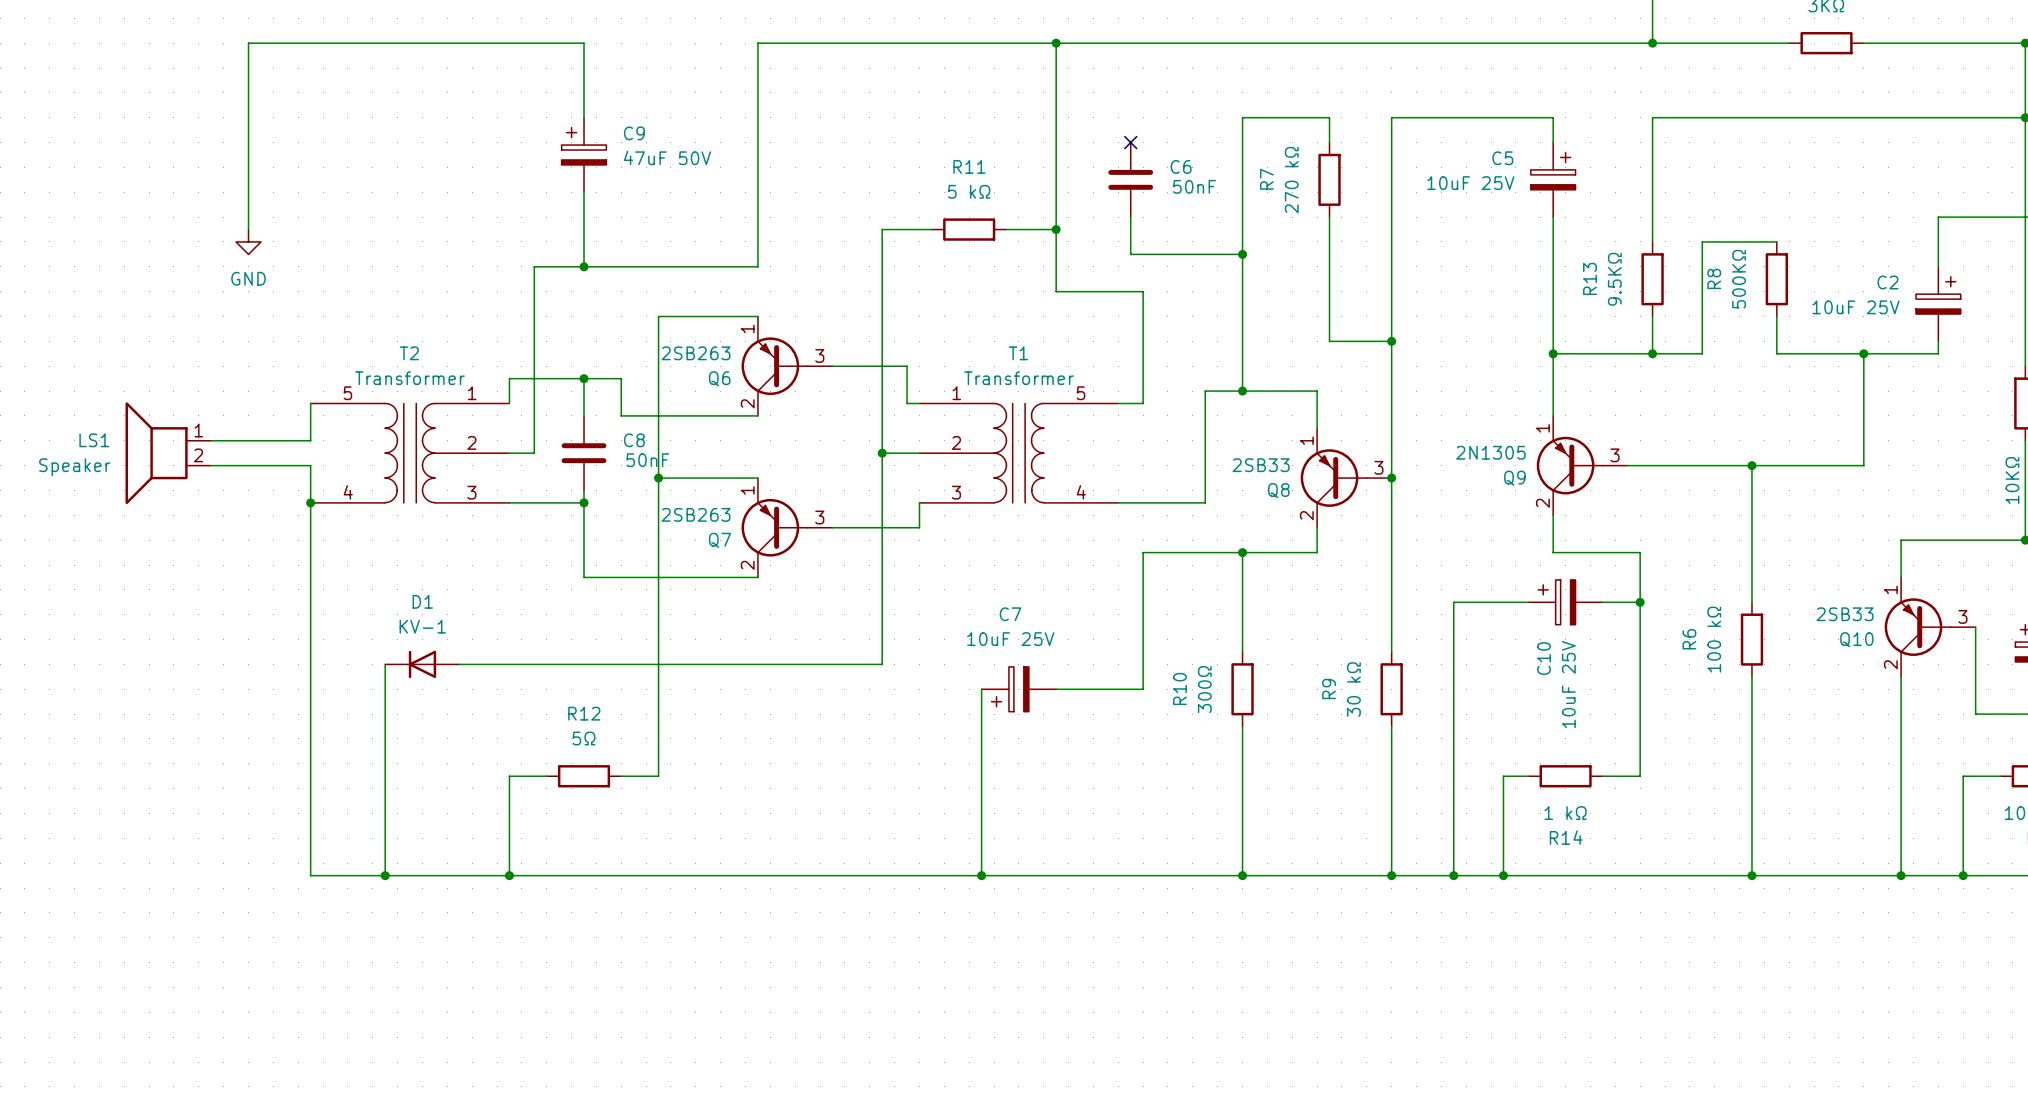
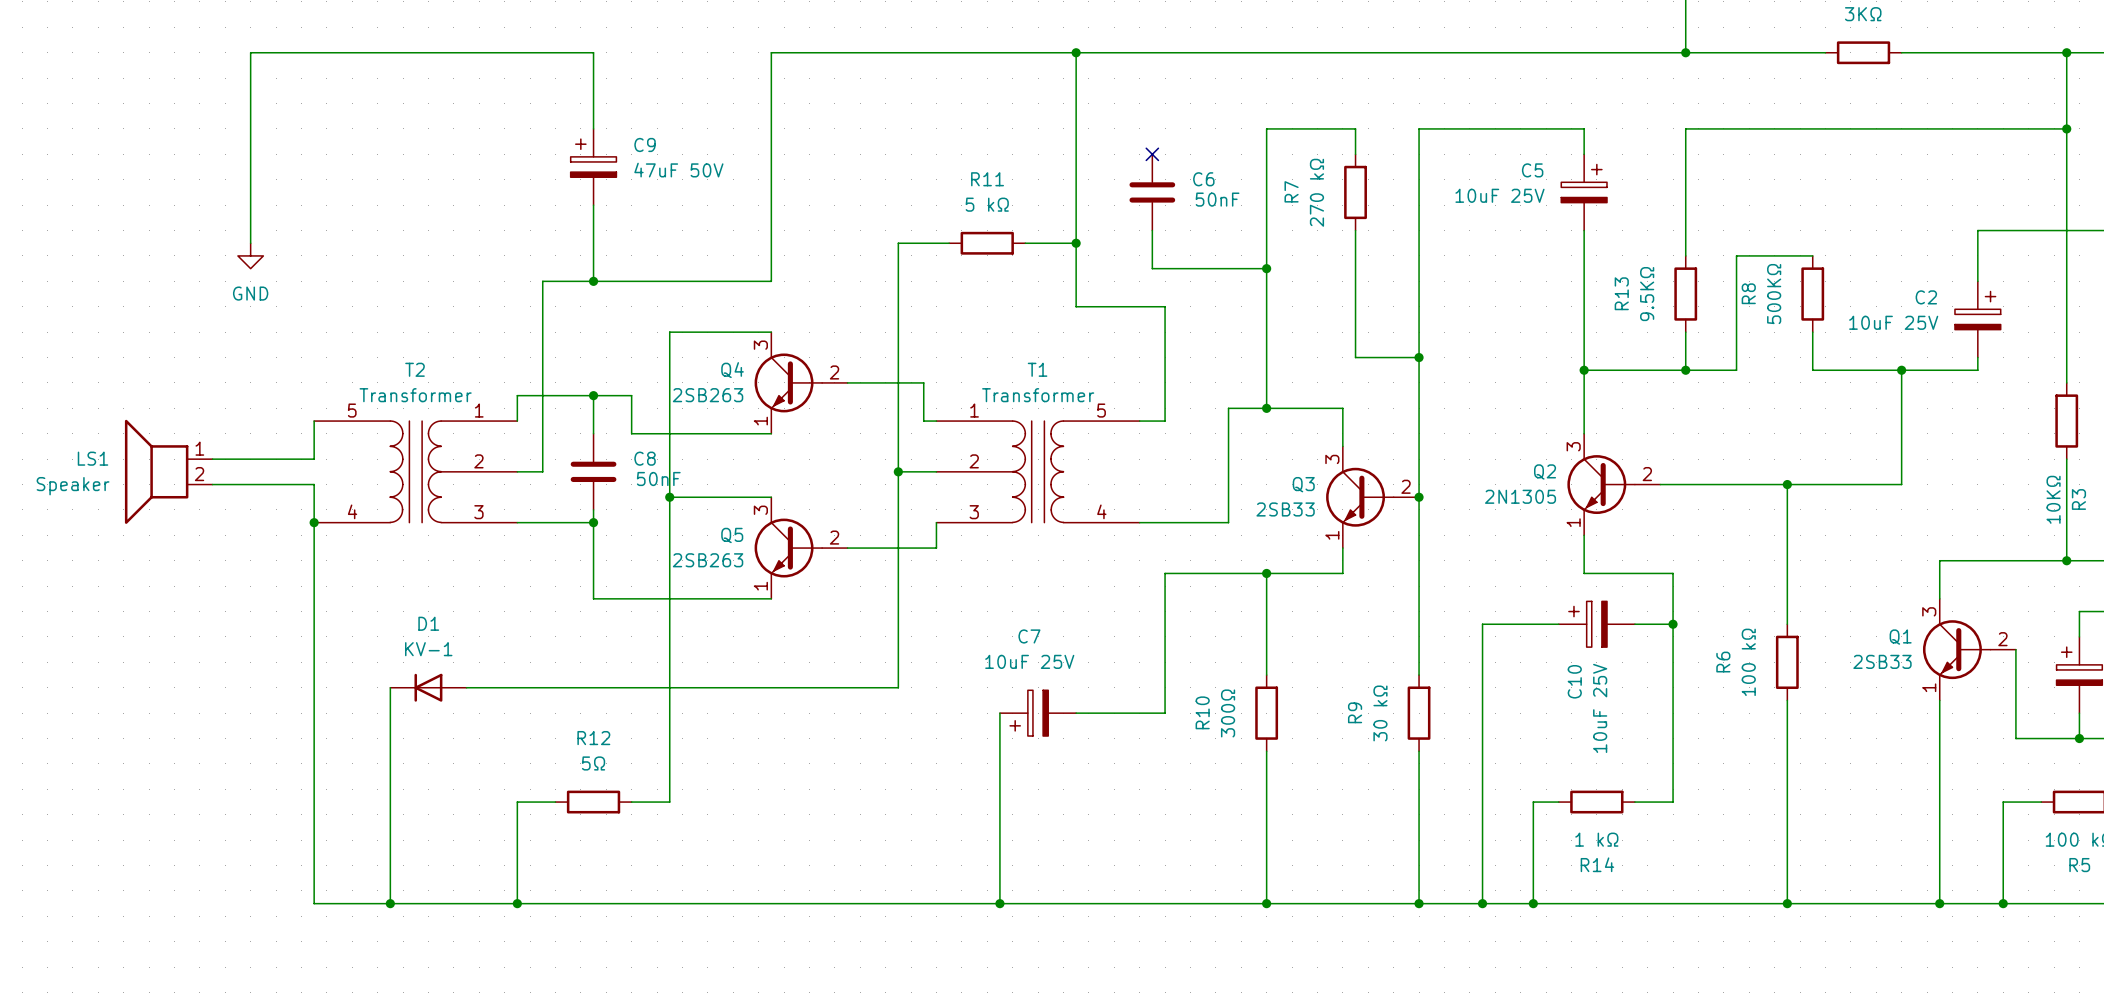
Q6: 2SB263 (787, 366) -> none
Q4: none -> 2SB263 (801, 382)
Q9: 2N1305 (1582, 465) -> none
Q2: none -> 2N1305 (1613, 484)
Q8: 2SB33 (1346, 478) -> none
Q3: none -> 2SB33 (1372, 497)
Q7: 2SB263 (787, 527) -> none
Q5: none -> 2SB263 (801, 548)
Q10: 2SB33 (1930, 627) -> none
Q1: none -> 2SB33 (1969, 649)

